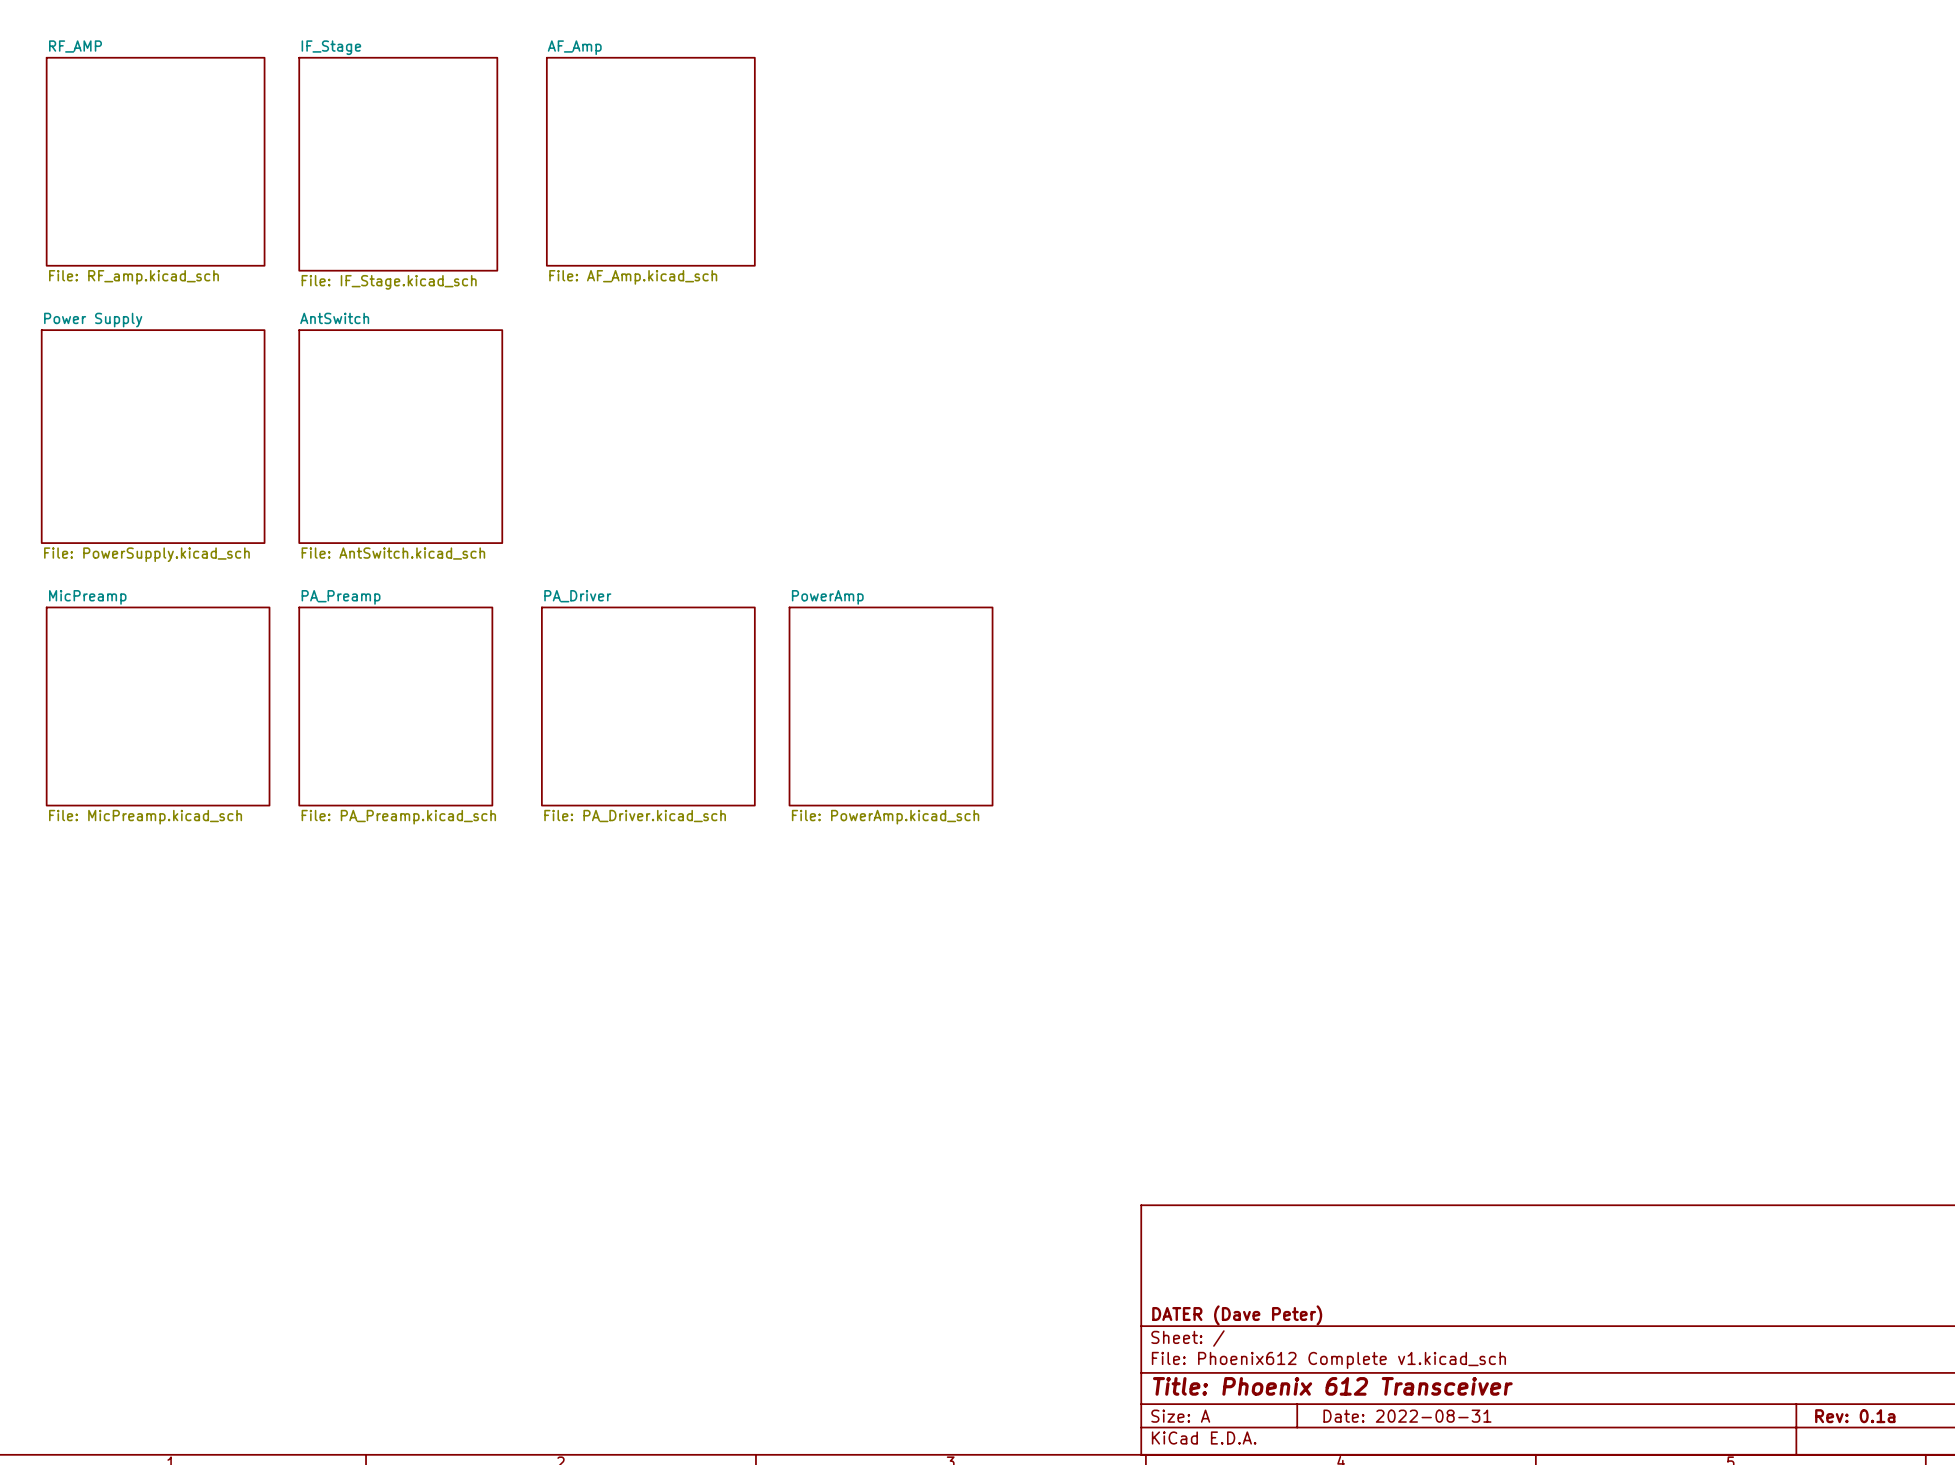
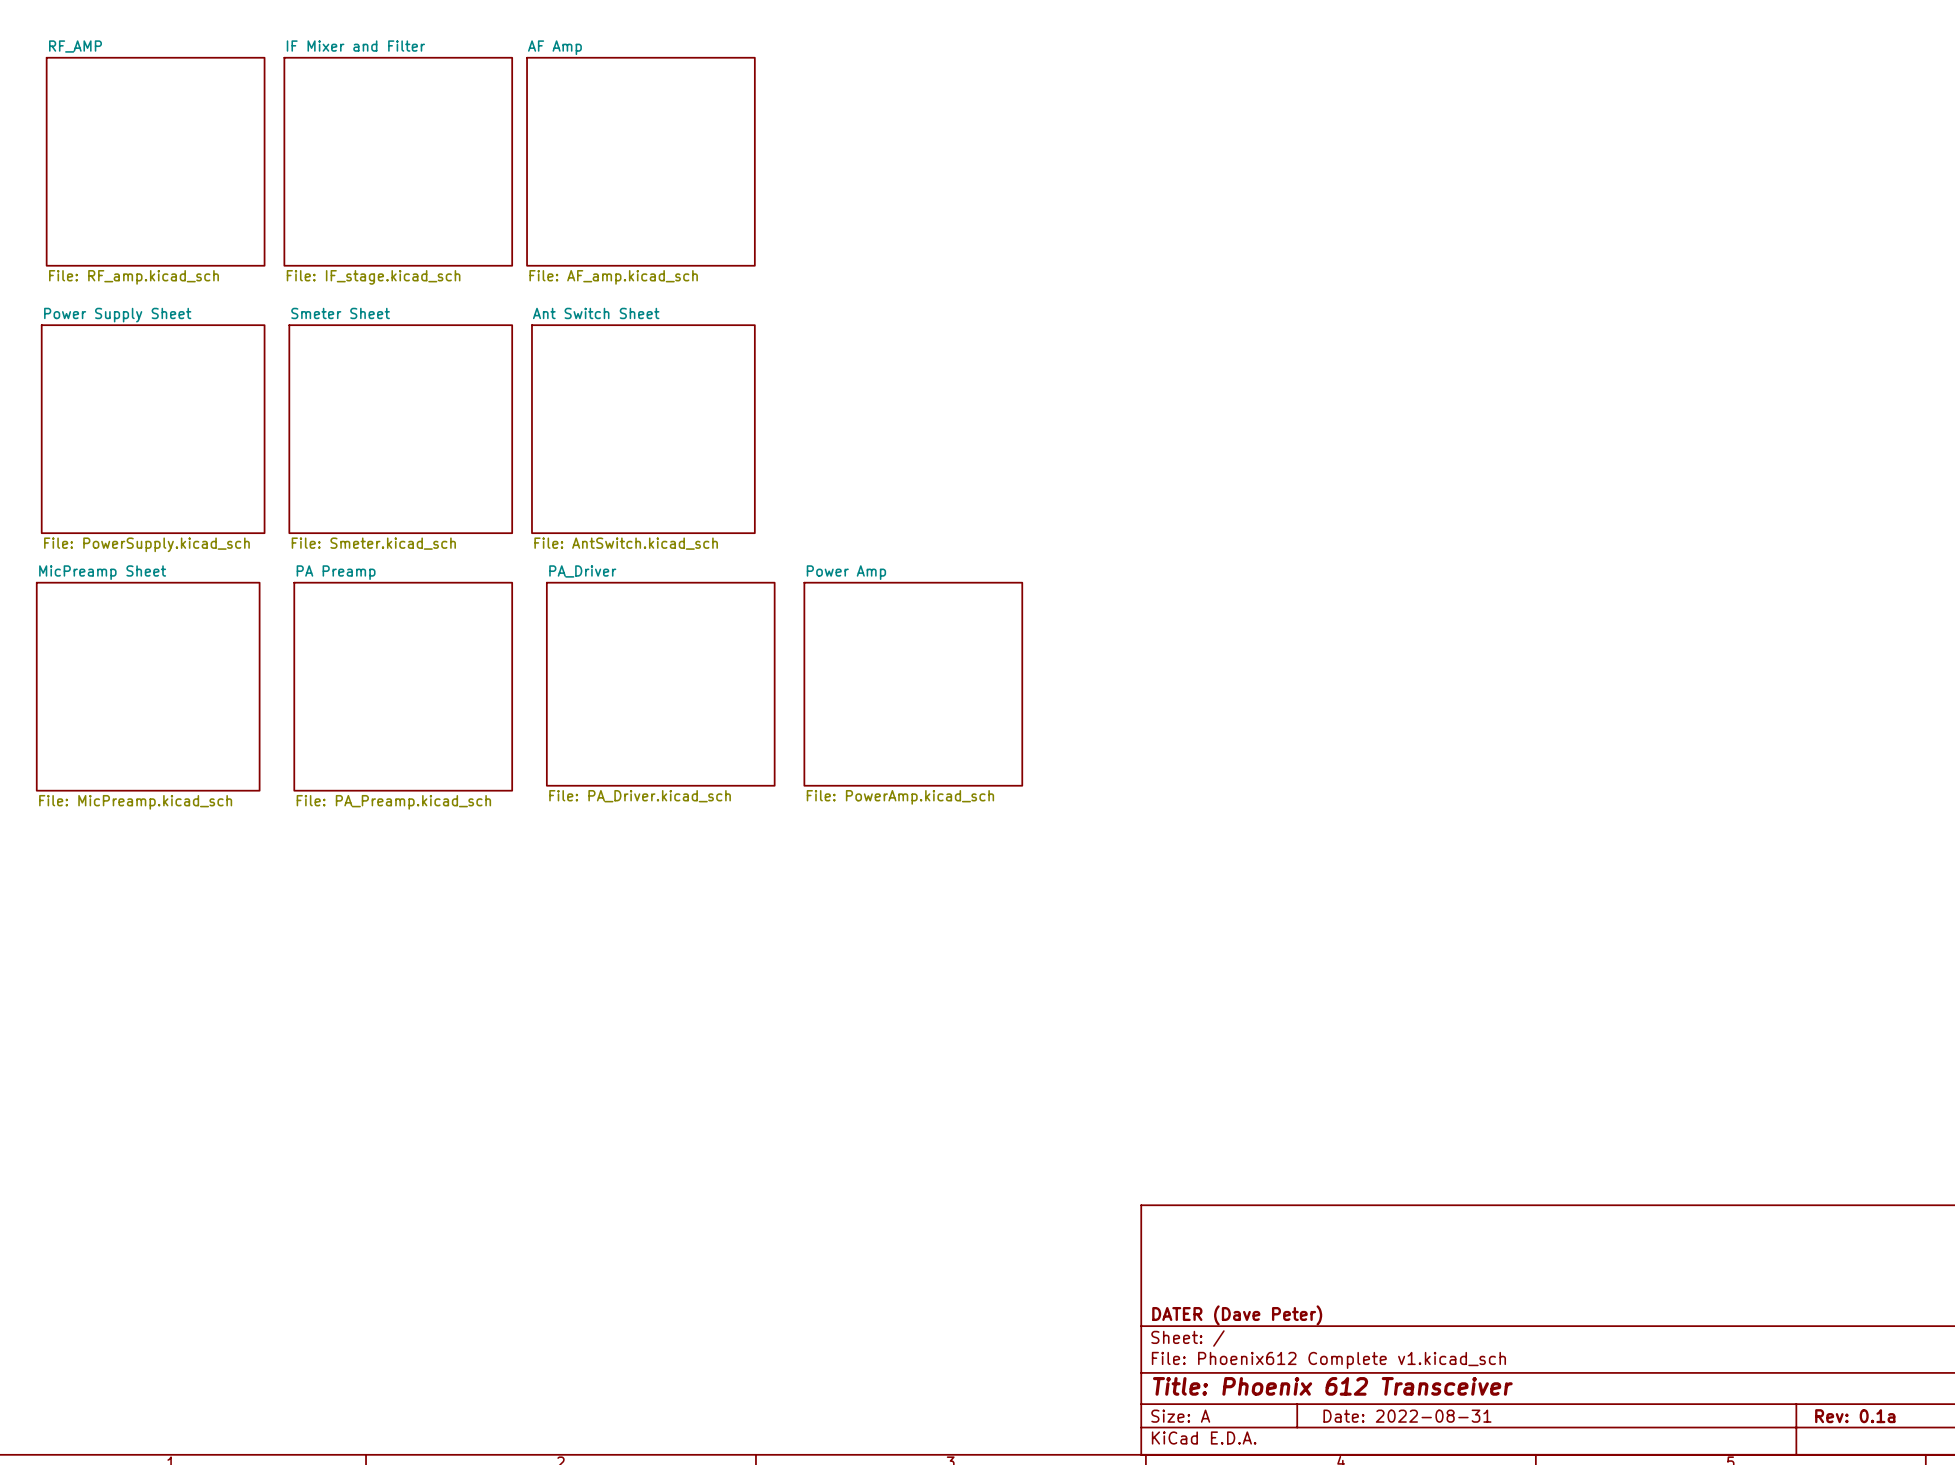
sheet IF Mixer and Filter: none -> File: IF_stage.kicad_sch (398, 161)
sheet AF Amp: none -> File: AF_amp.kicad_sch (640, 161)
sheet AF_Amp: File: AF_Amp.kicad_sch (650, 161) -> none
sheet IF_Stage: File: IF_Stage.kicad_sch (398, 164) -> none
sheet Power Supply Sheet: none -> File: PowerSupply.kicad_sch (153, 429)
sheet Smeter Sheet: none -> File: Smeter.kicad_sch (400, 429)
sheet Ant Switch Sheet: none -> File: AntSwitch.kicad_sch (643, 429)
sheet Power Supply: File: PowerSupply.kicad_sch (153, 436) -> none
sheet AntSwitch: File: AntSwitch.kicad_sch (400, 436) -> none
sheet PA_Driver: none -> File: PA_Driver.kicad_sch (660, 684)
sheet Power Amp: none -> File: PowerAmp.kicad_sch (913, 684)
sheet MicPreamp Sheet: none -> File: MicPreamp.kicad_sch (148, 686)
sheet PA Preamp: none -> File: PA_Preamp.kicad_sch (403, 686)
sheet MicPreamp: File: MicPreamp.kicad_sch (158, 706) -> none
sheet PA_Preamp: File: PA_Preamp.kicad_sch (395, 706) -> none
sheet PA_Driver: File: PA_Driver.kicad_sch (648, 706) -> none
sheet PowerAmp: File: PowerAmp.kicad_sch (891, 706) -> none

